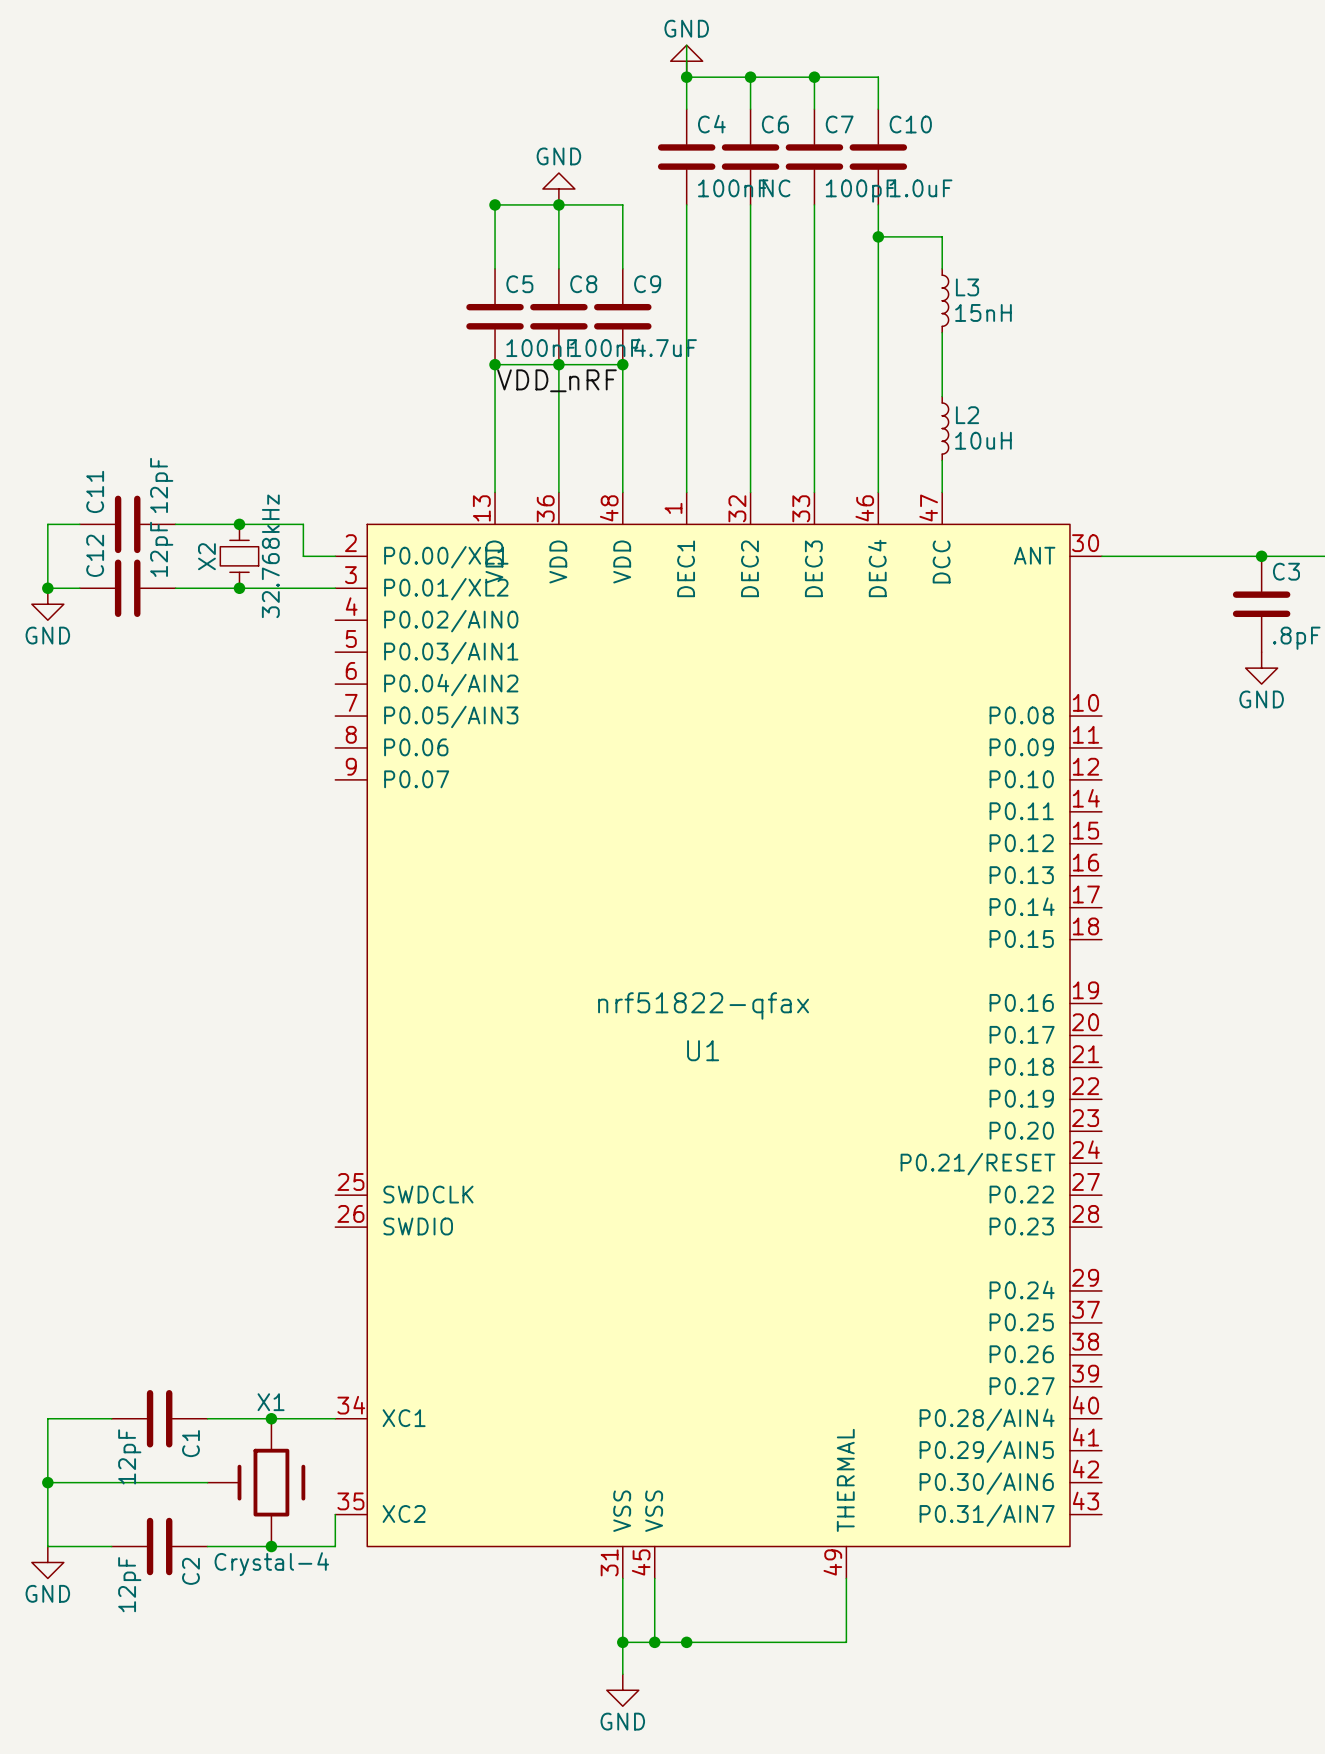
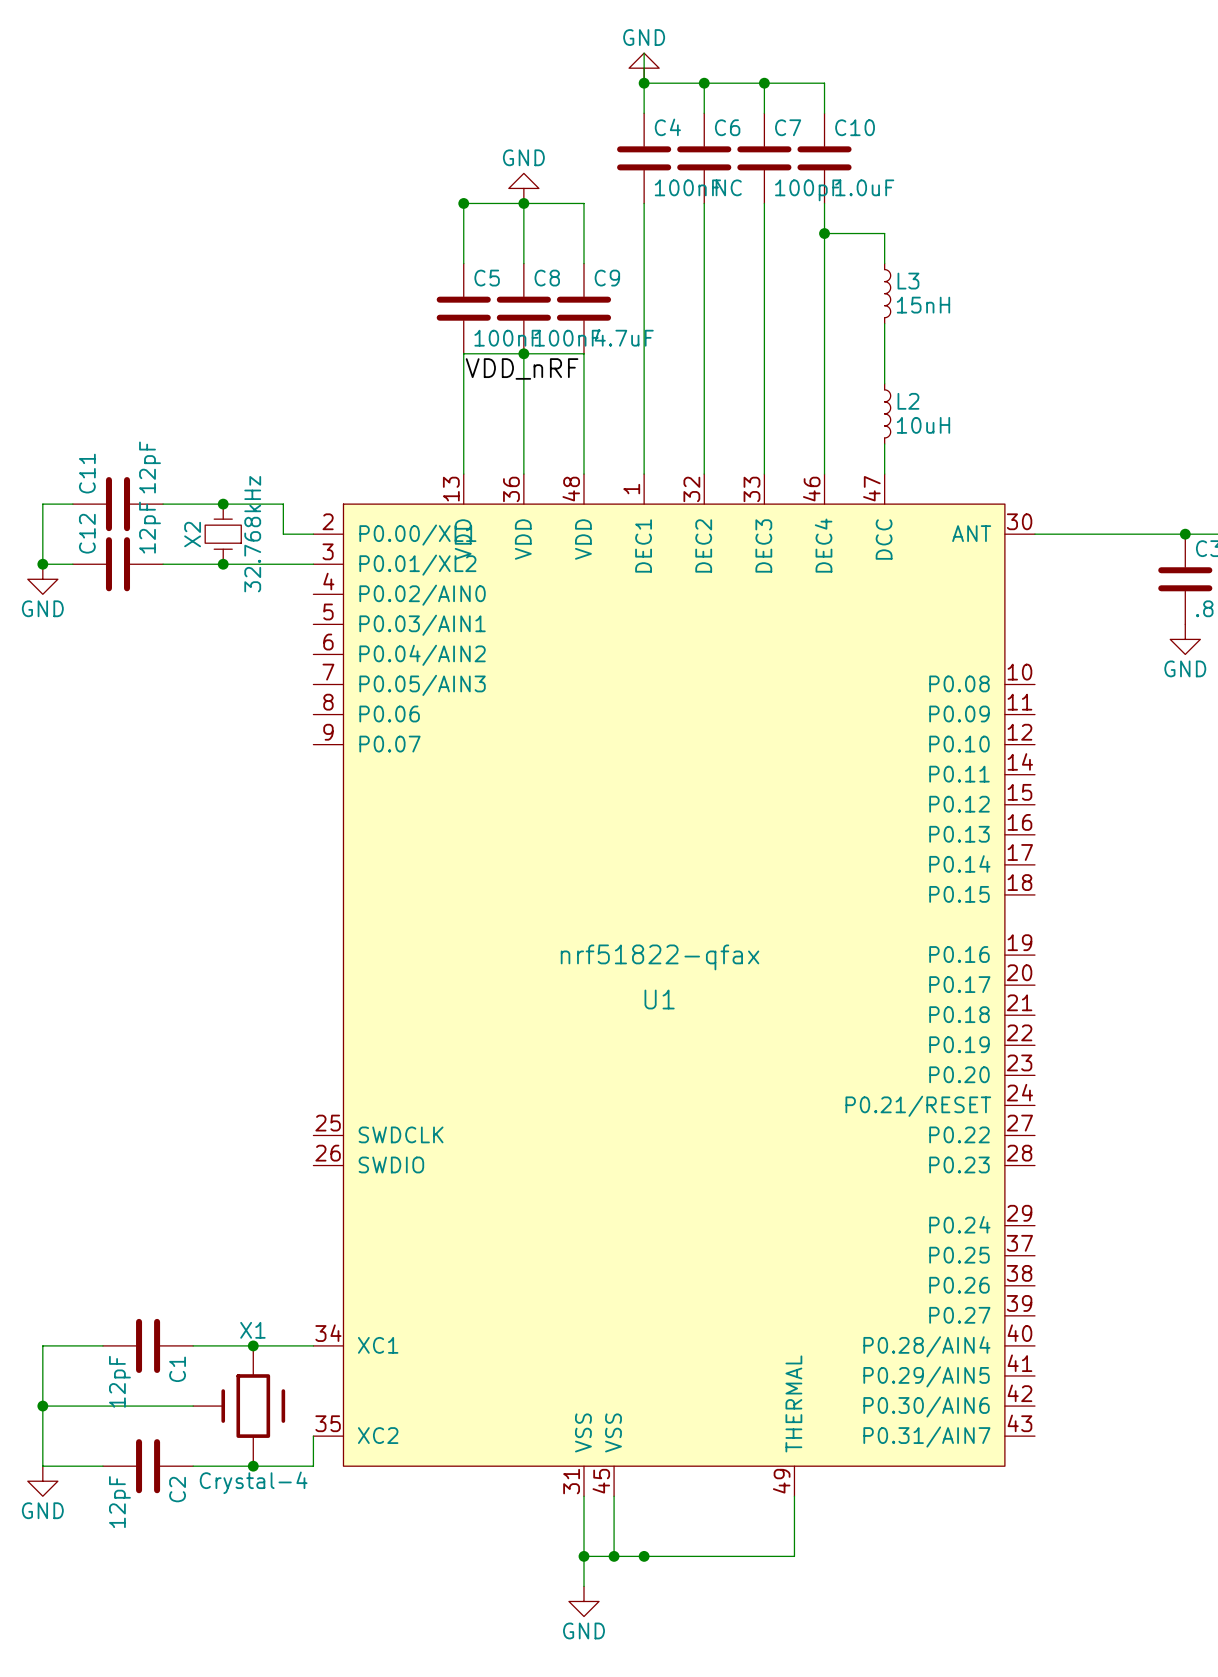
junction: (495, 364) -> none
junction: (622, 364) -> none

